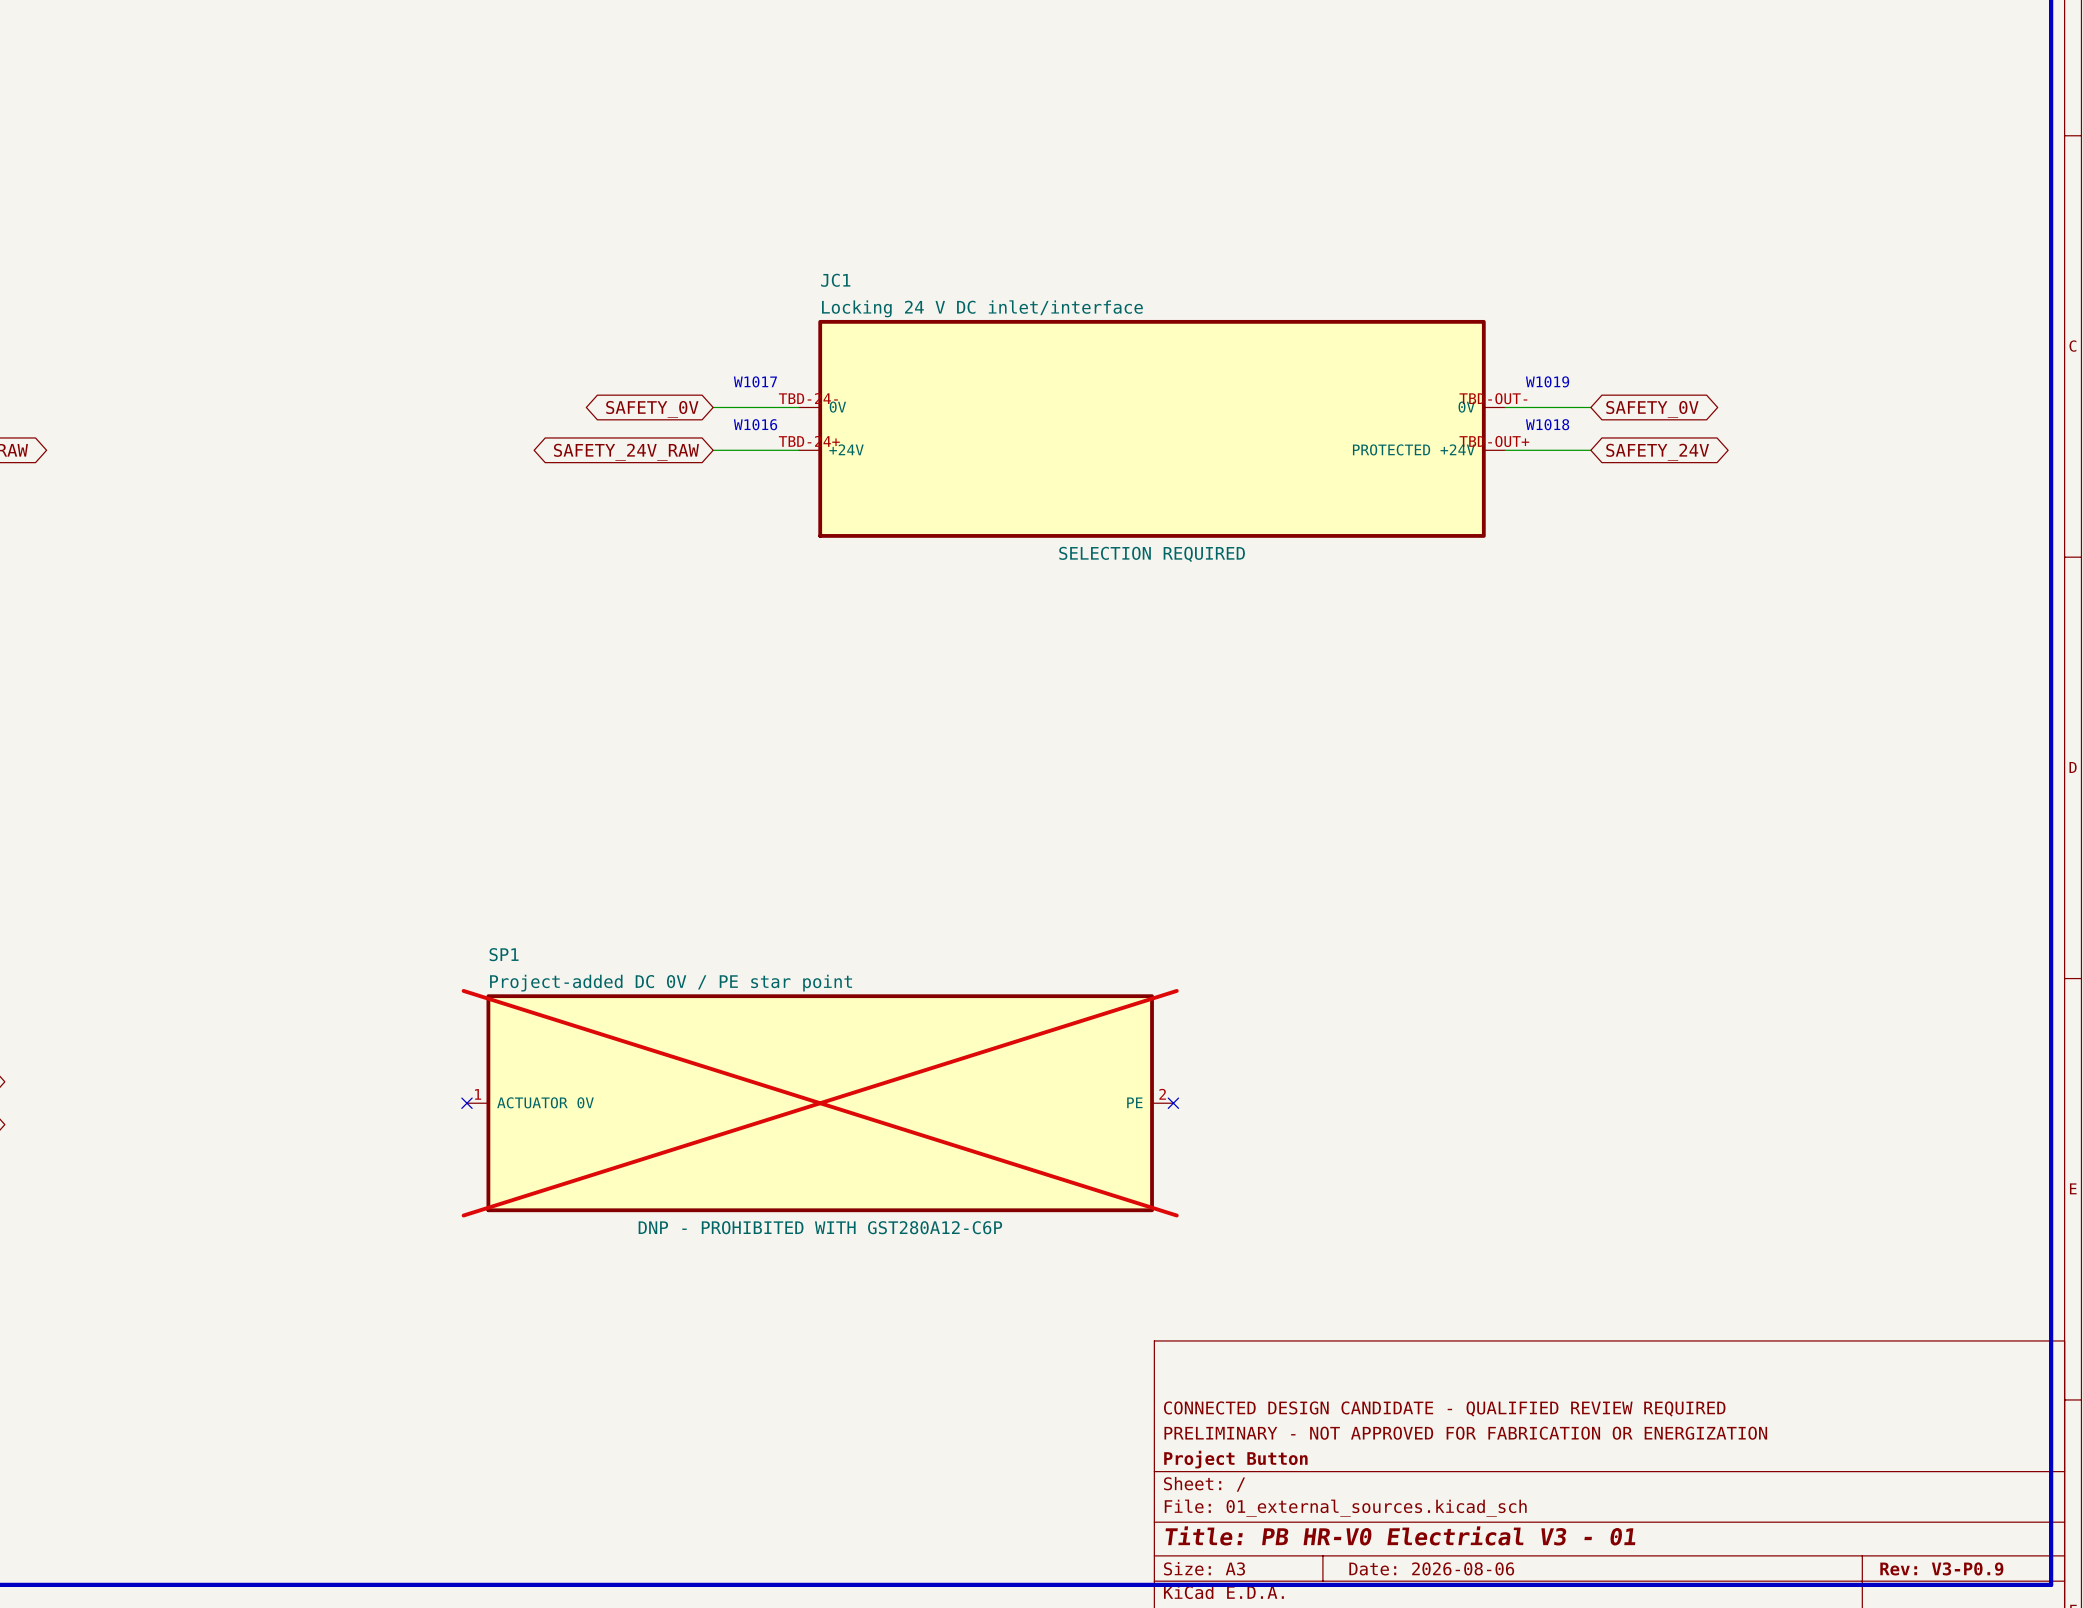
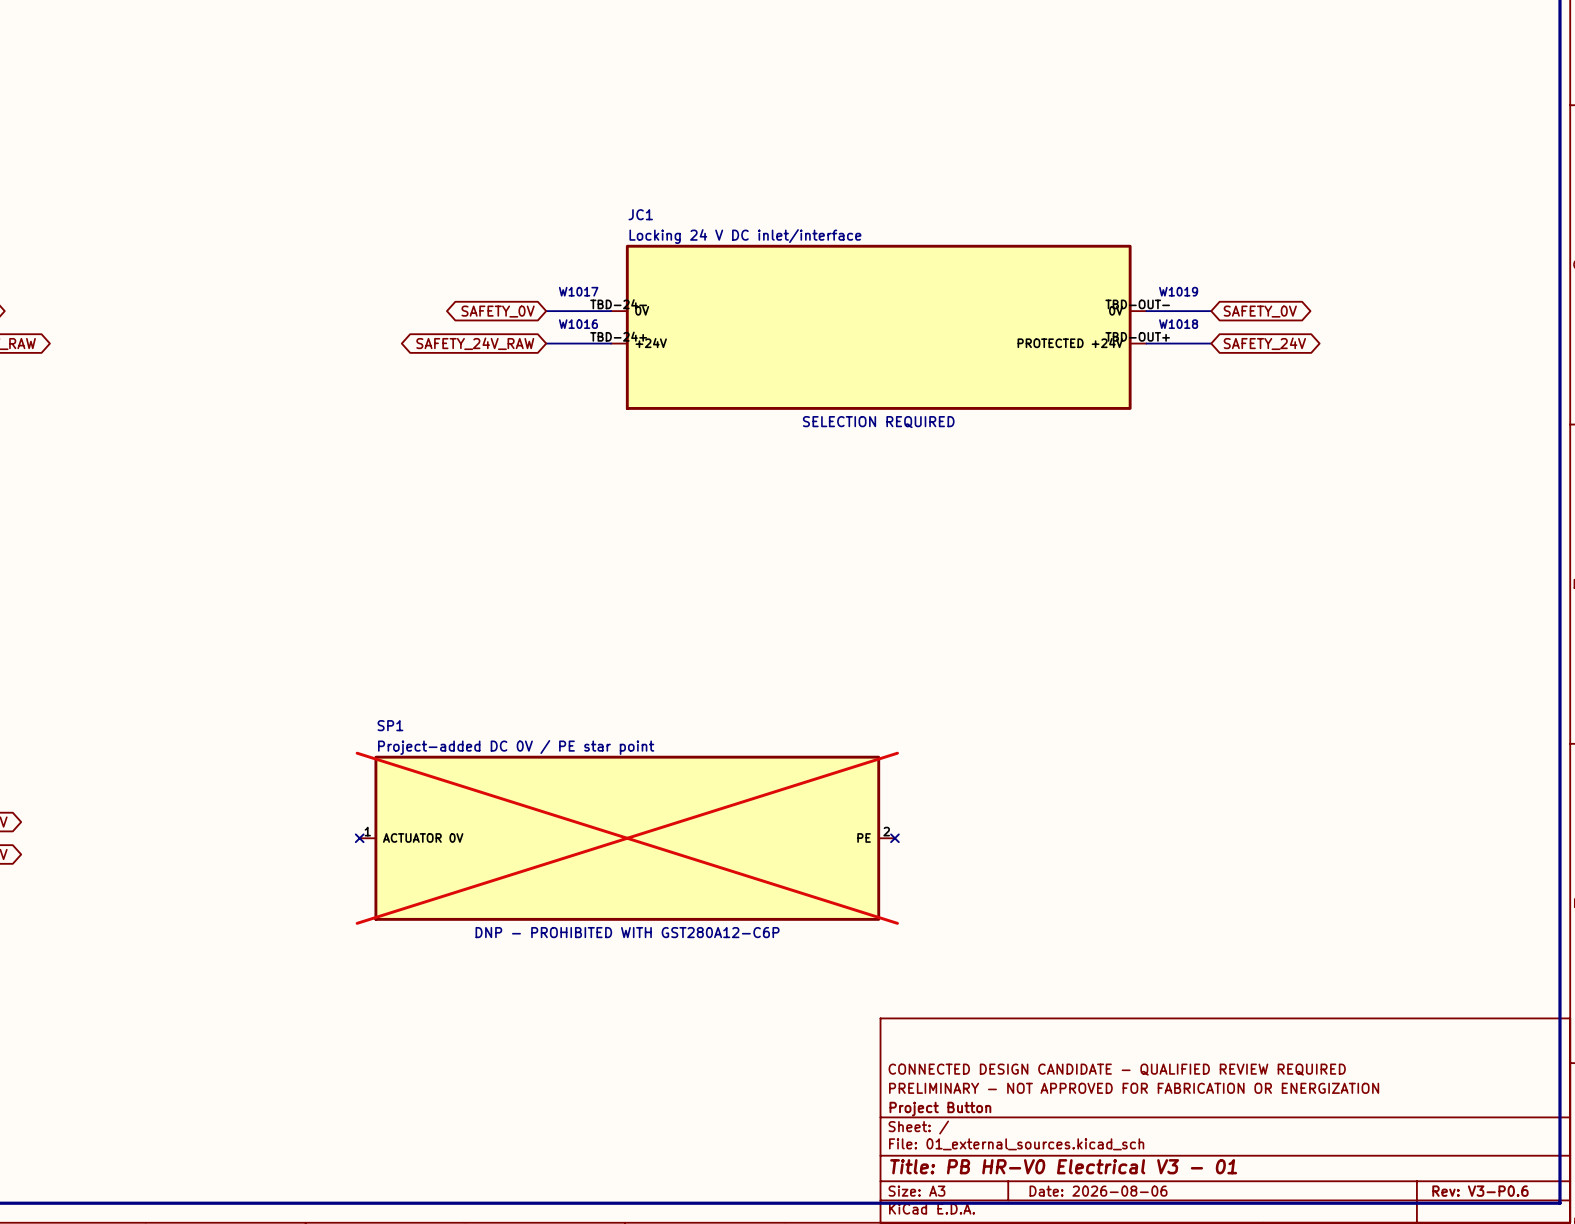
title block: Rev: V3-P0.9 (1941, 1568) -> Rev: V3-P0.6 (1480, 1191)

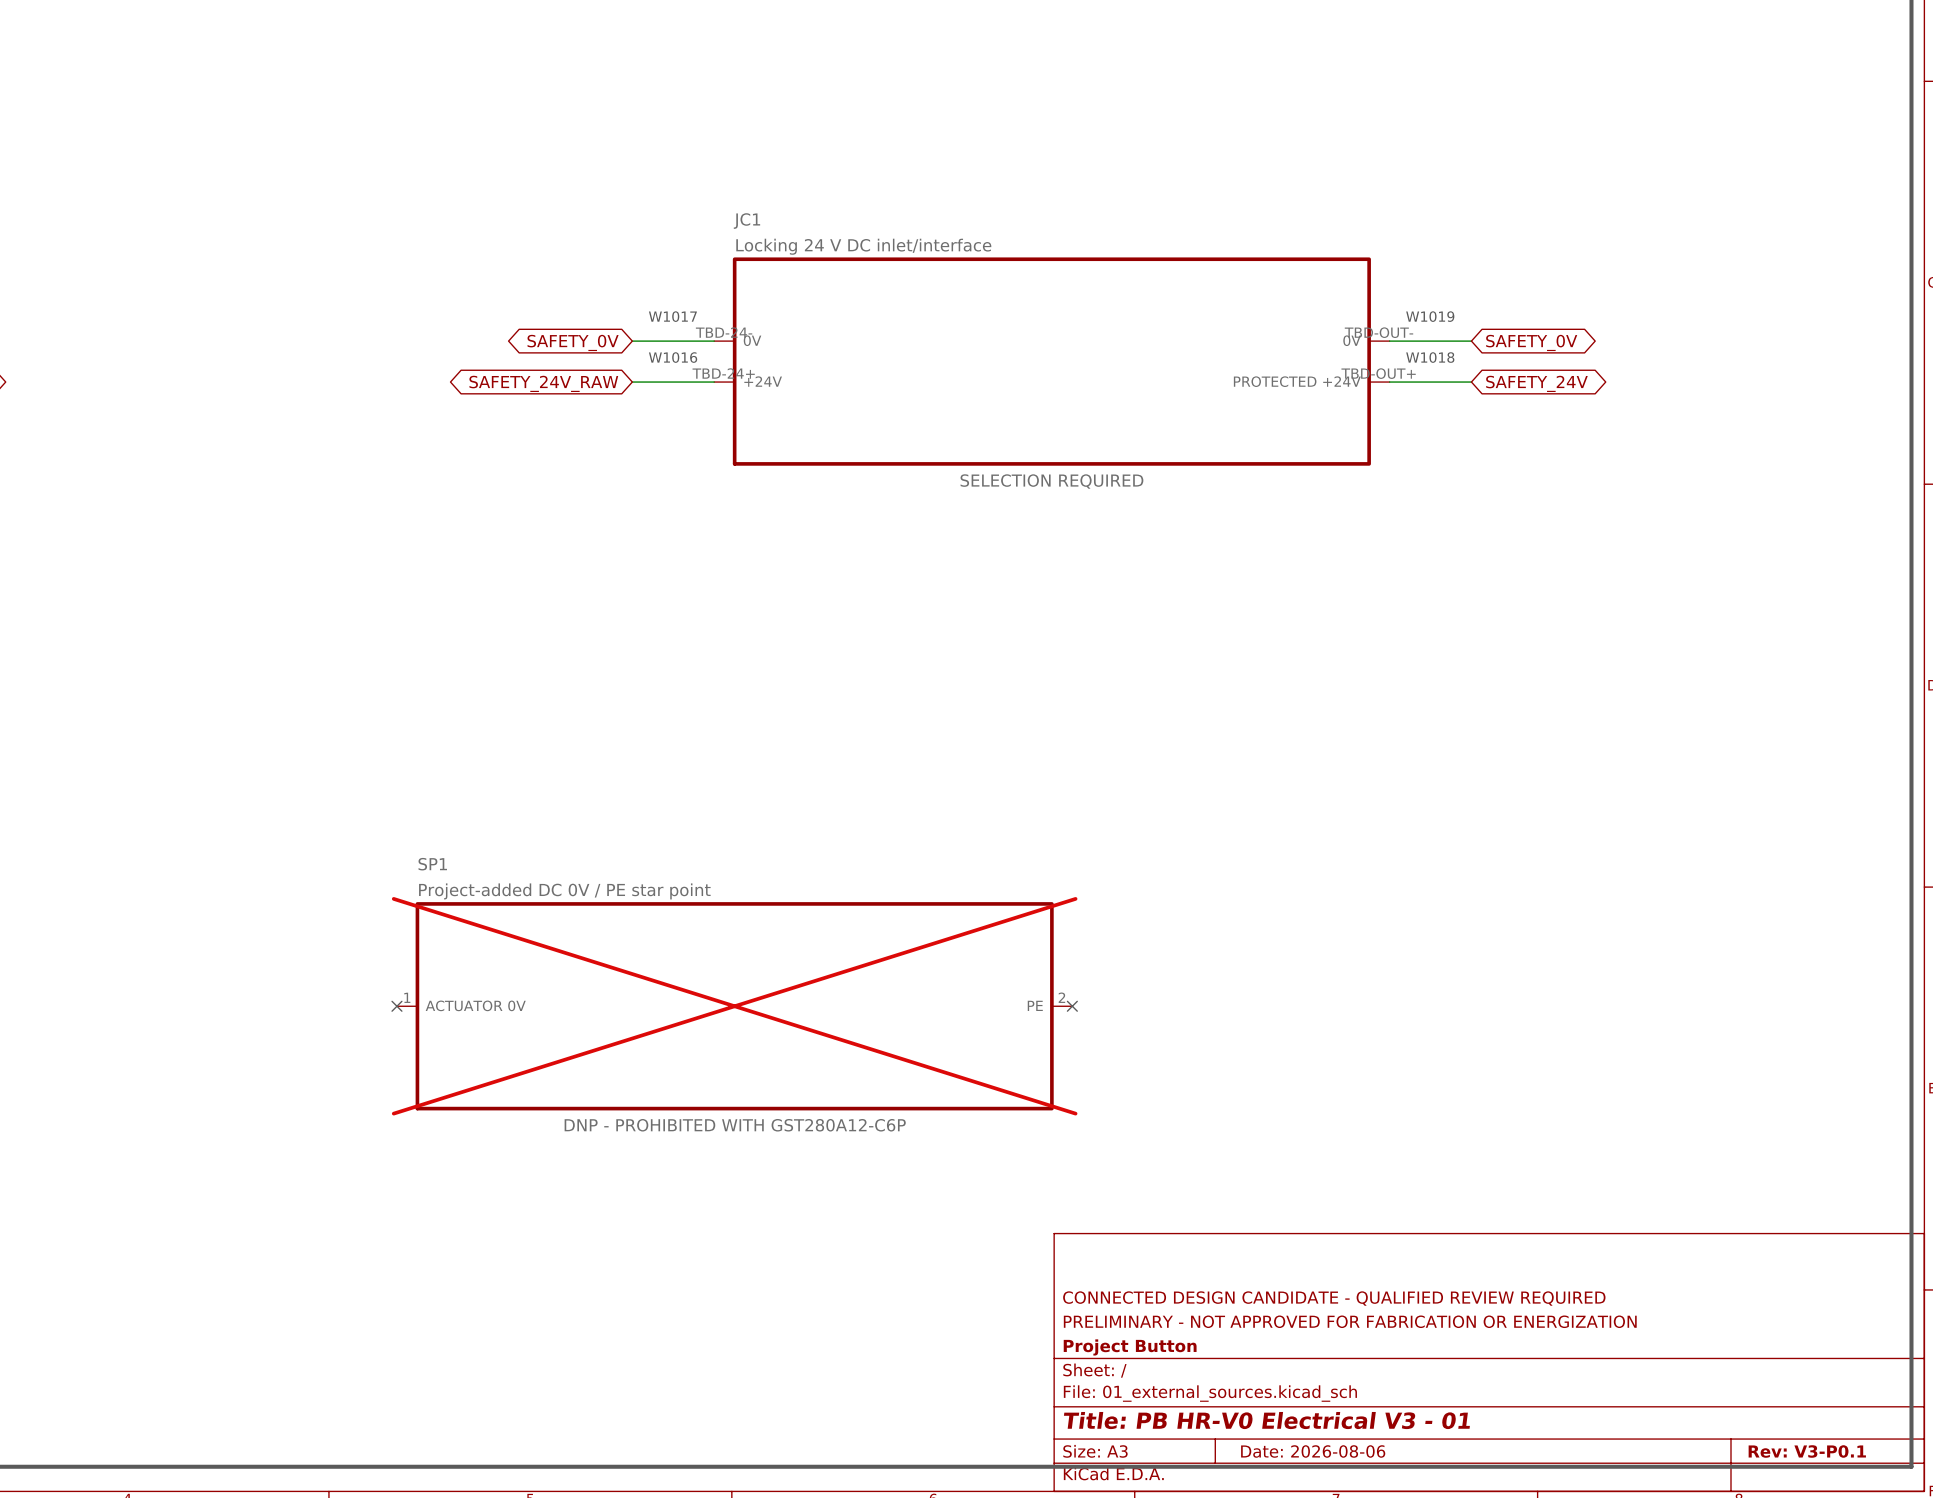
title block: Rev: V3-P0.6 (1480, 1191) -> Rev: V3-P0.1 (1807, 1451)

